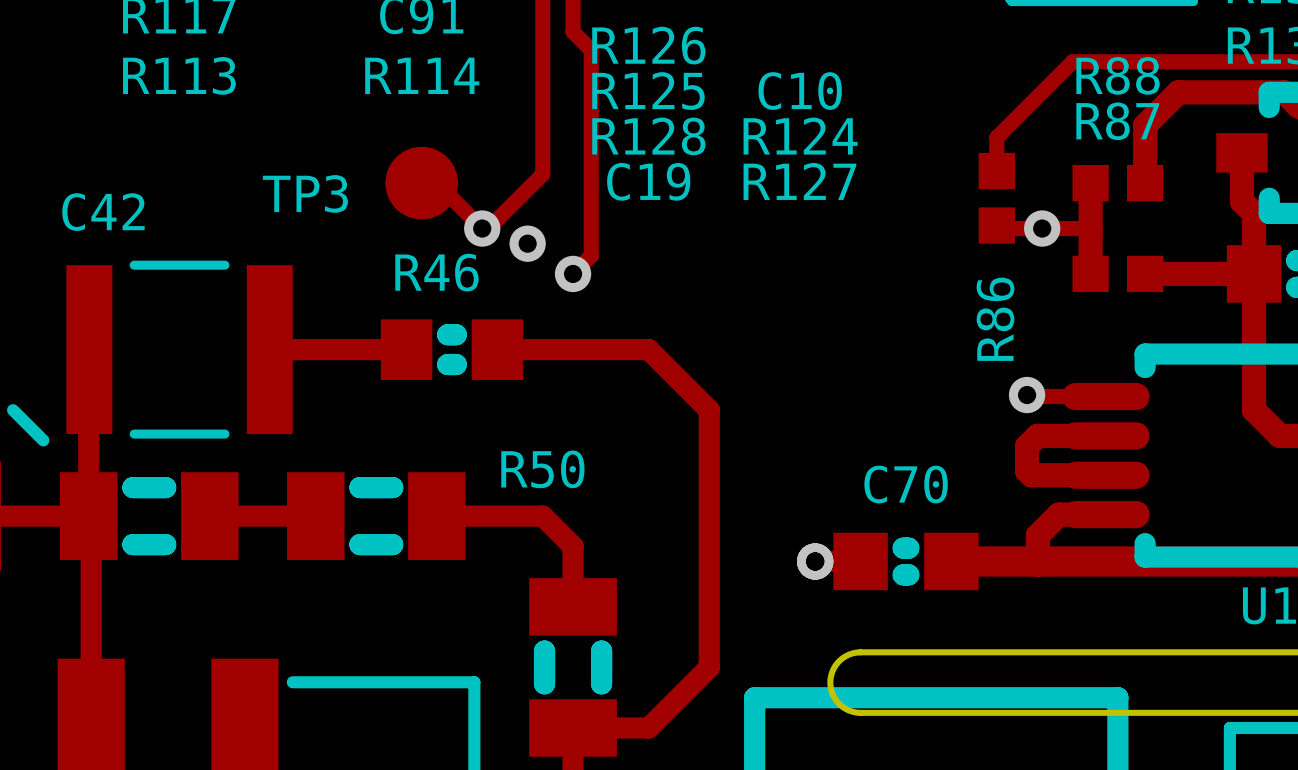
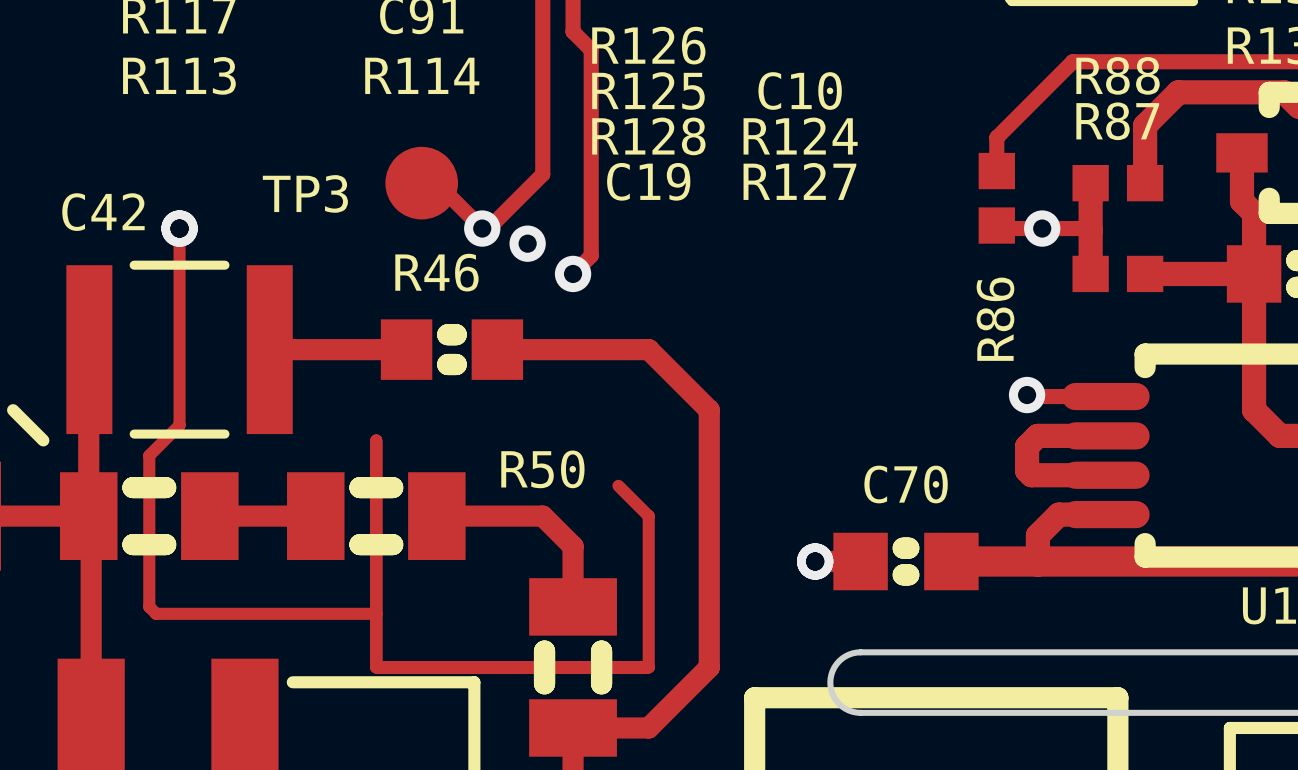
track: none -> (179, 228) (179, 425) (149, 455) (149, 606) (156, 613) (376, 613)
via: none -> (179, 228)
track: none -> (376, 440) (376, 667) (648, 667) (648, 516) (618, 485)

